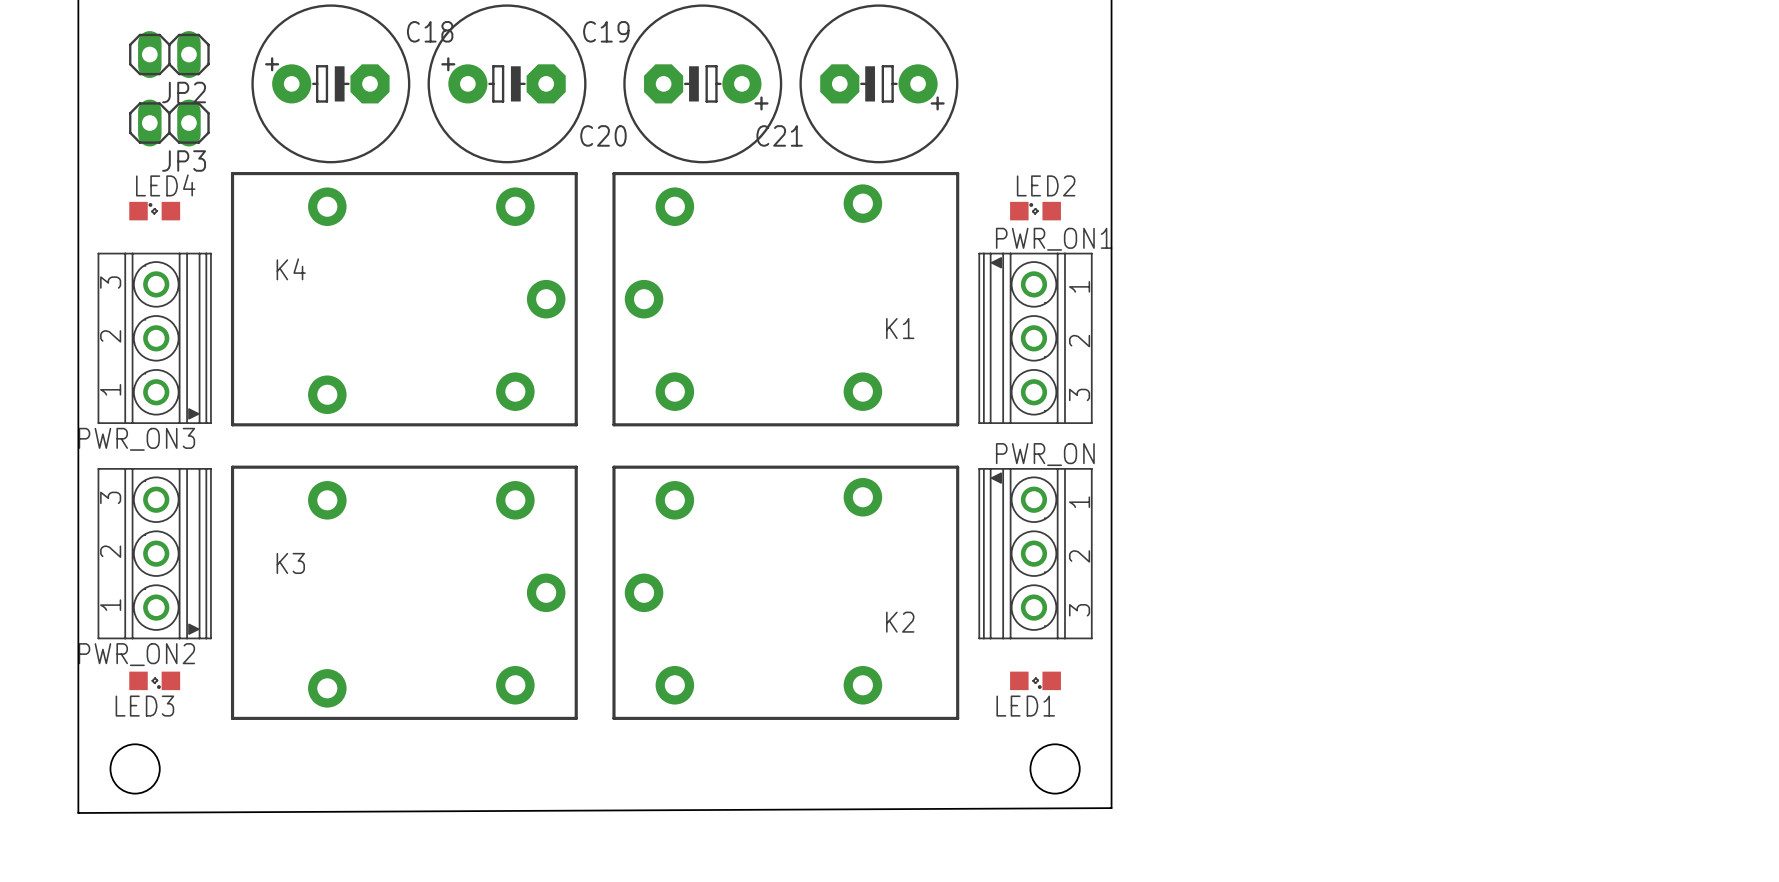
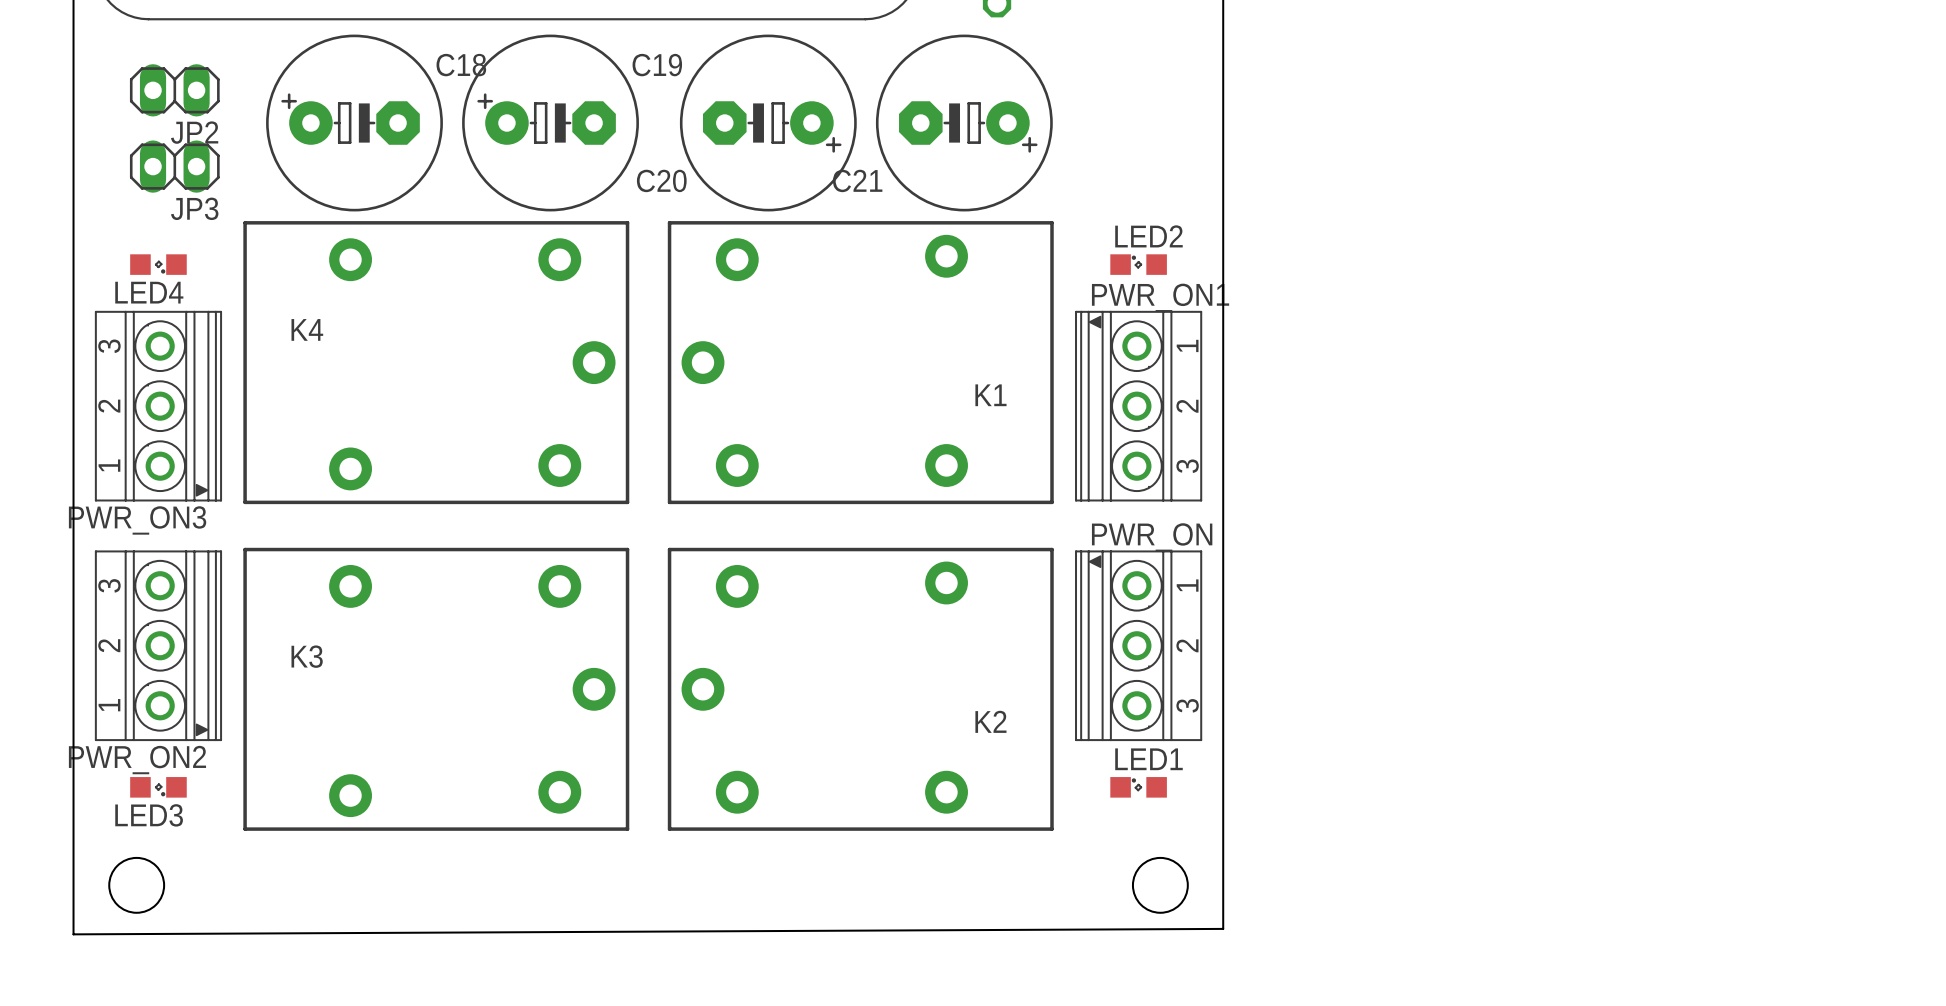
LED4 rotation: 0° (154, 211) -> 180° (158, 264)
LED1 rotation: 0° (1035, 680) -> 180° (1138, 787)

